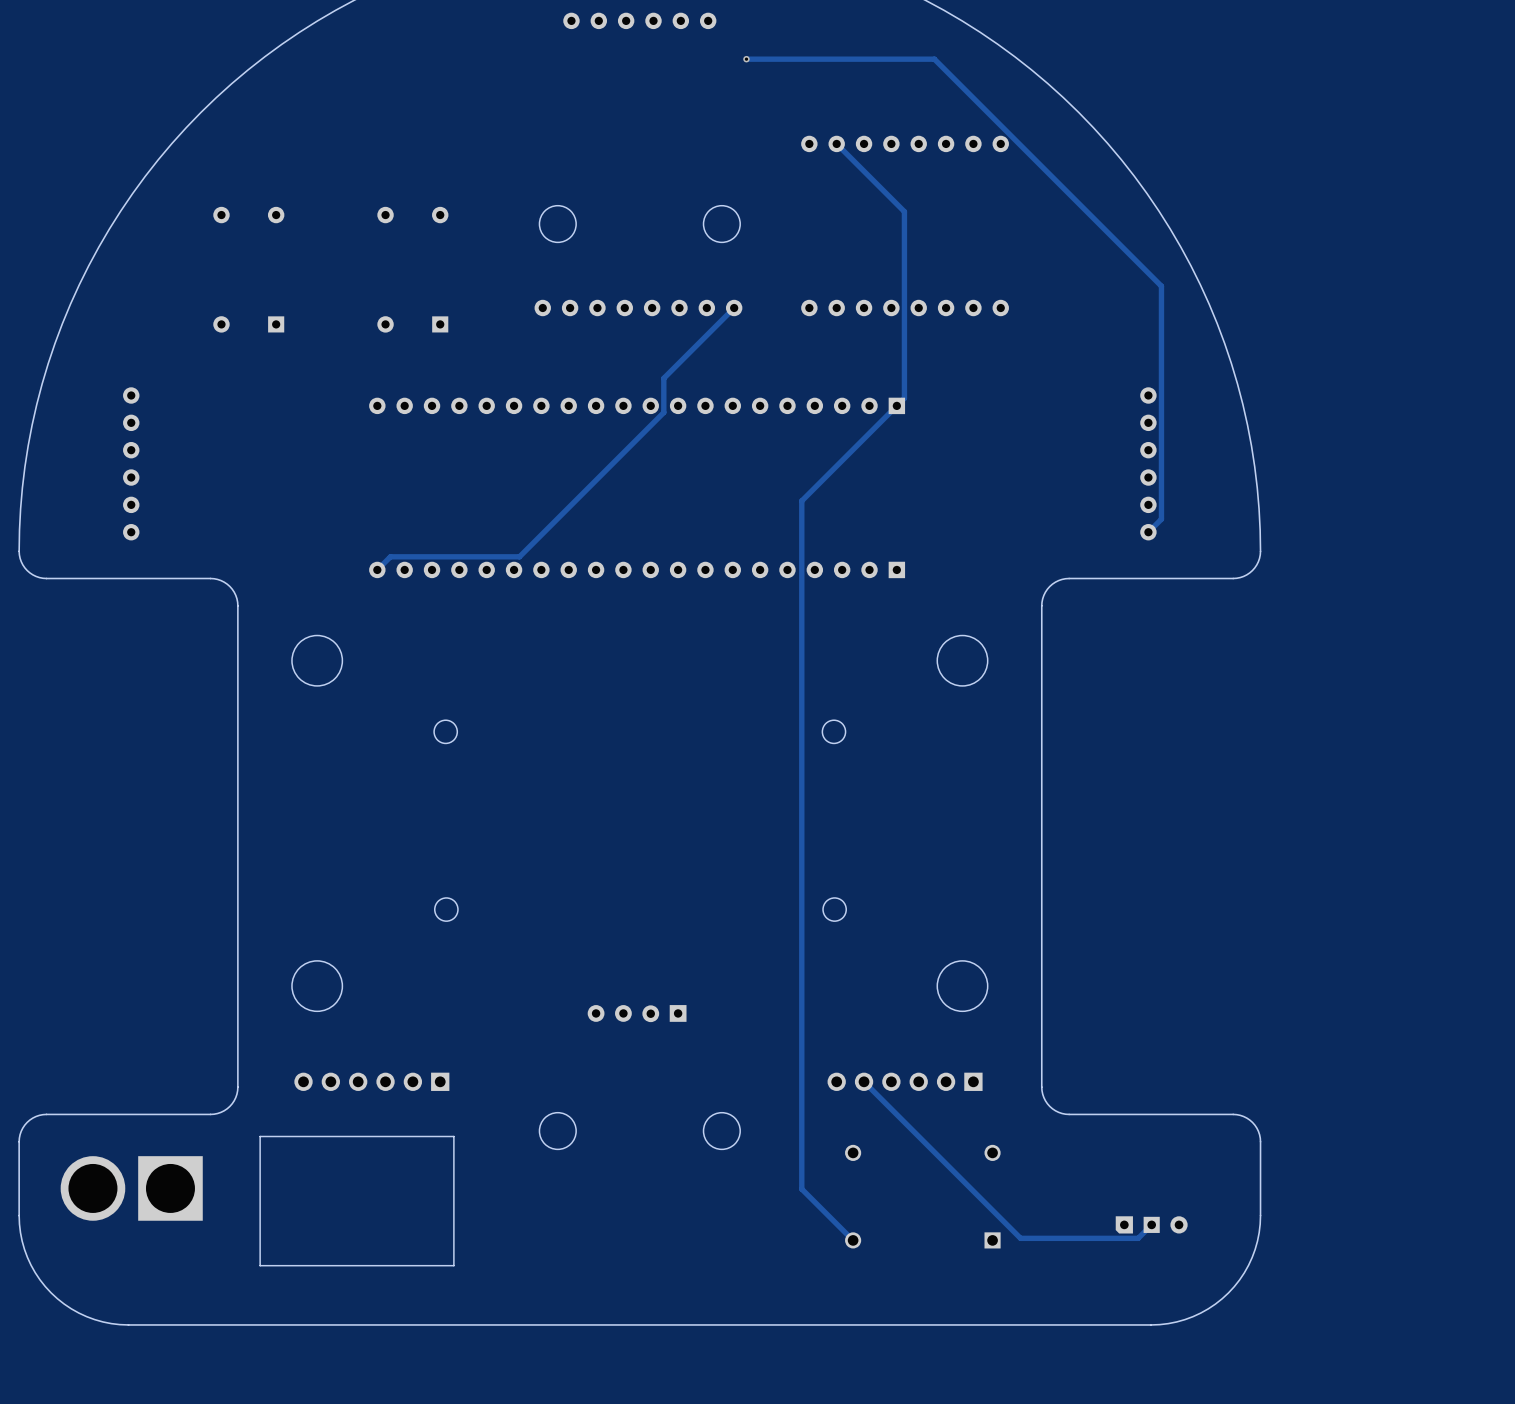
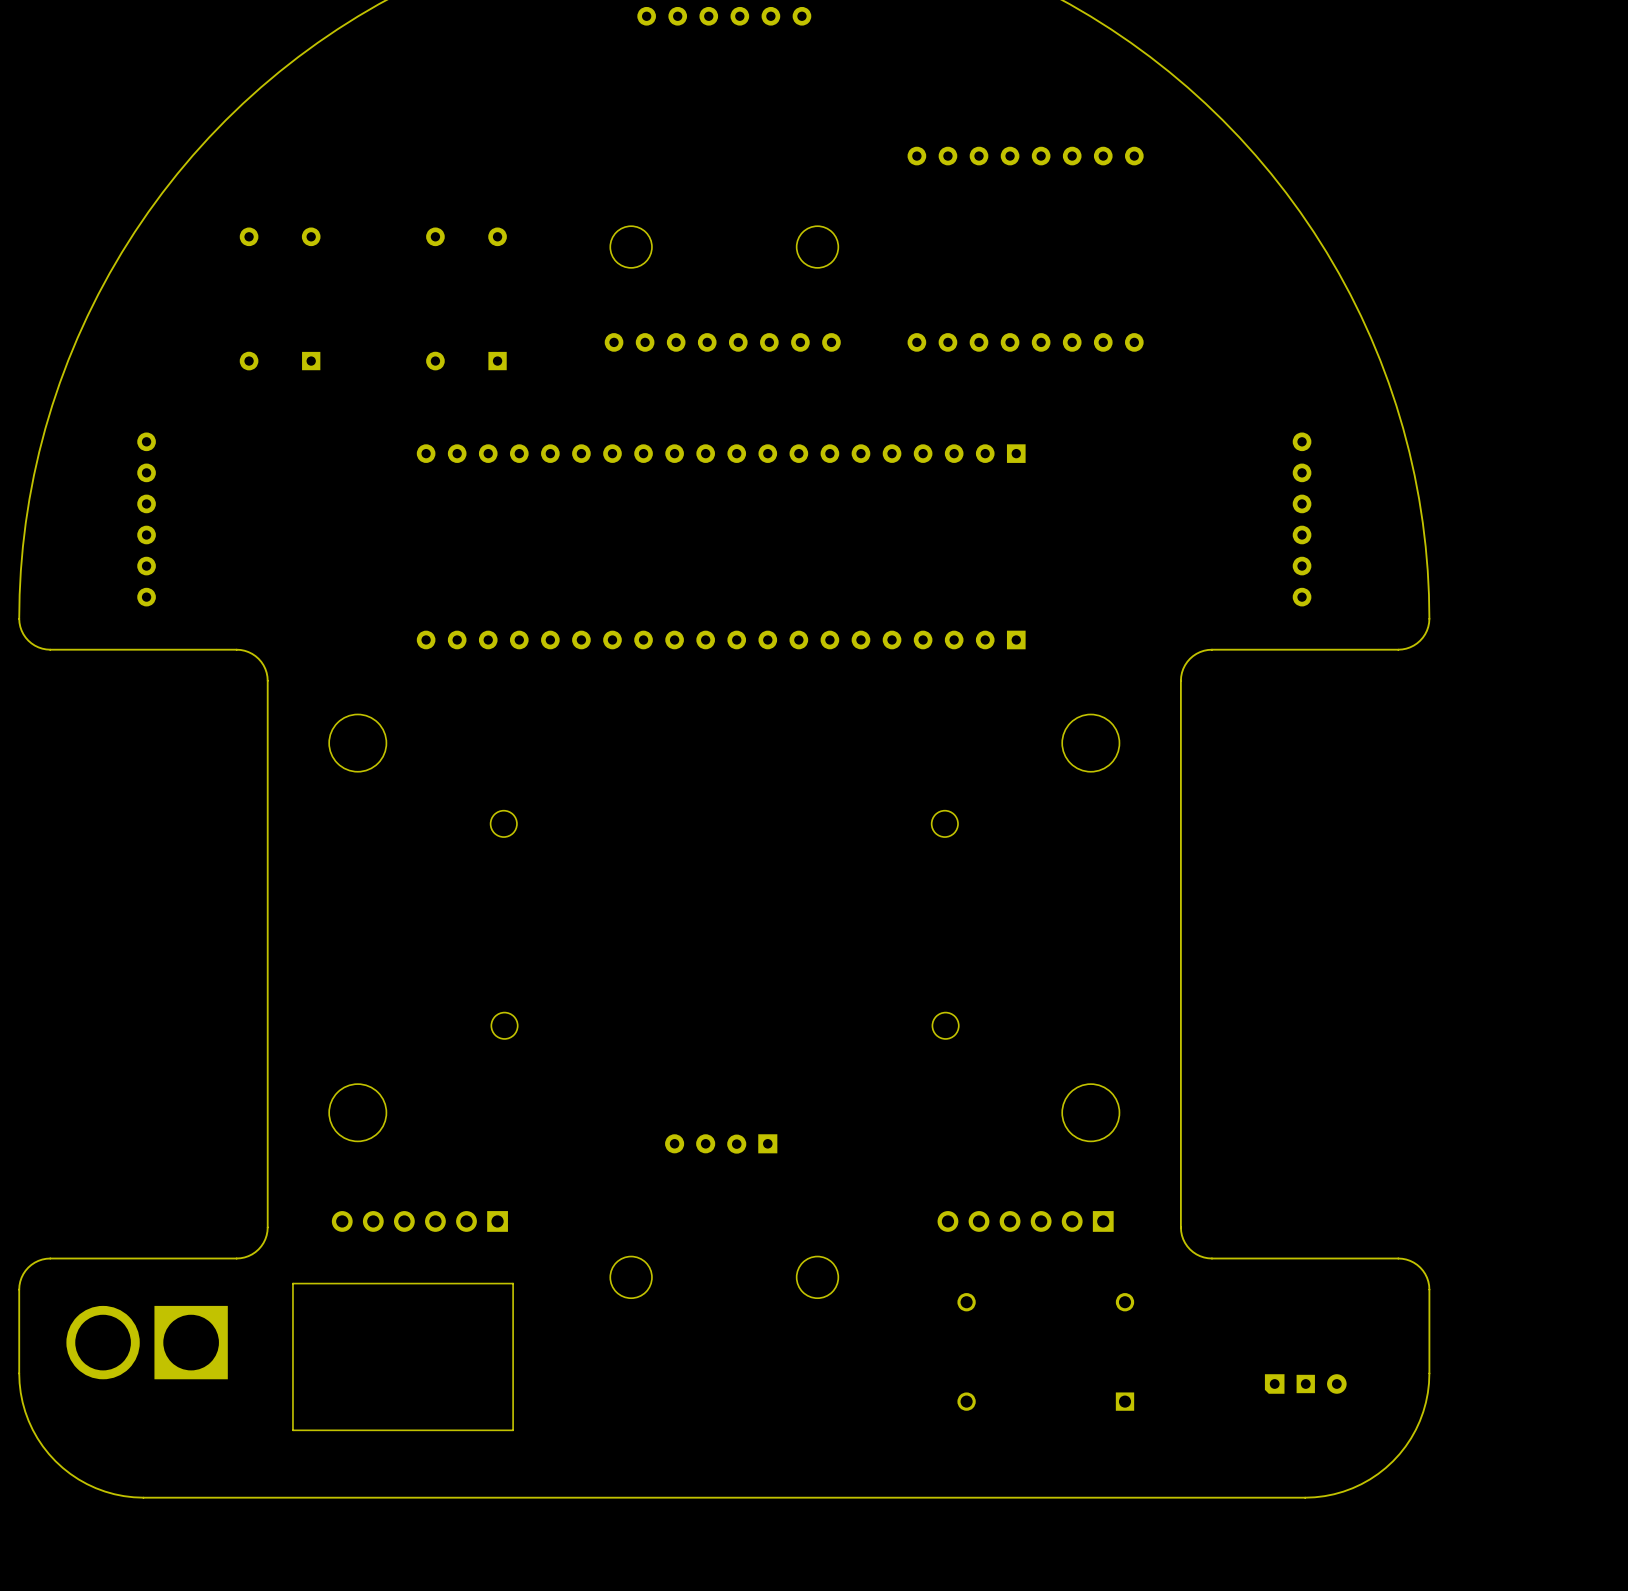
track: (746, 59) (934, 59) (1161, 286) (1161, 519) (1148, 532) -> none
via: (746, 59) -> none
track: (836, 143) (904, 211) (904, 398) (801, 500) (801, 1189) (853, 1240) -> none
track: (734, 308) (663, 378) (663, 412) (519, 556) (390, 556) (377, 569) -> none
track: (864, 1081) (1020, 1238) (1138, 1238) (1151, 1224) -> none

